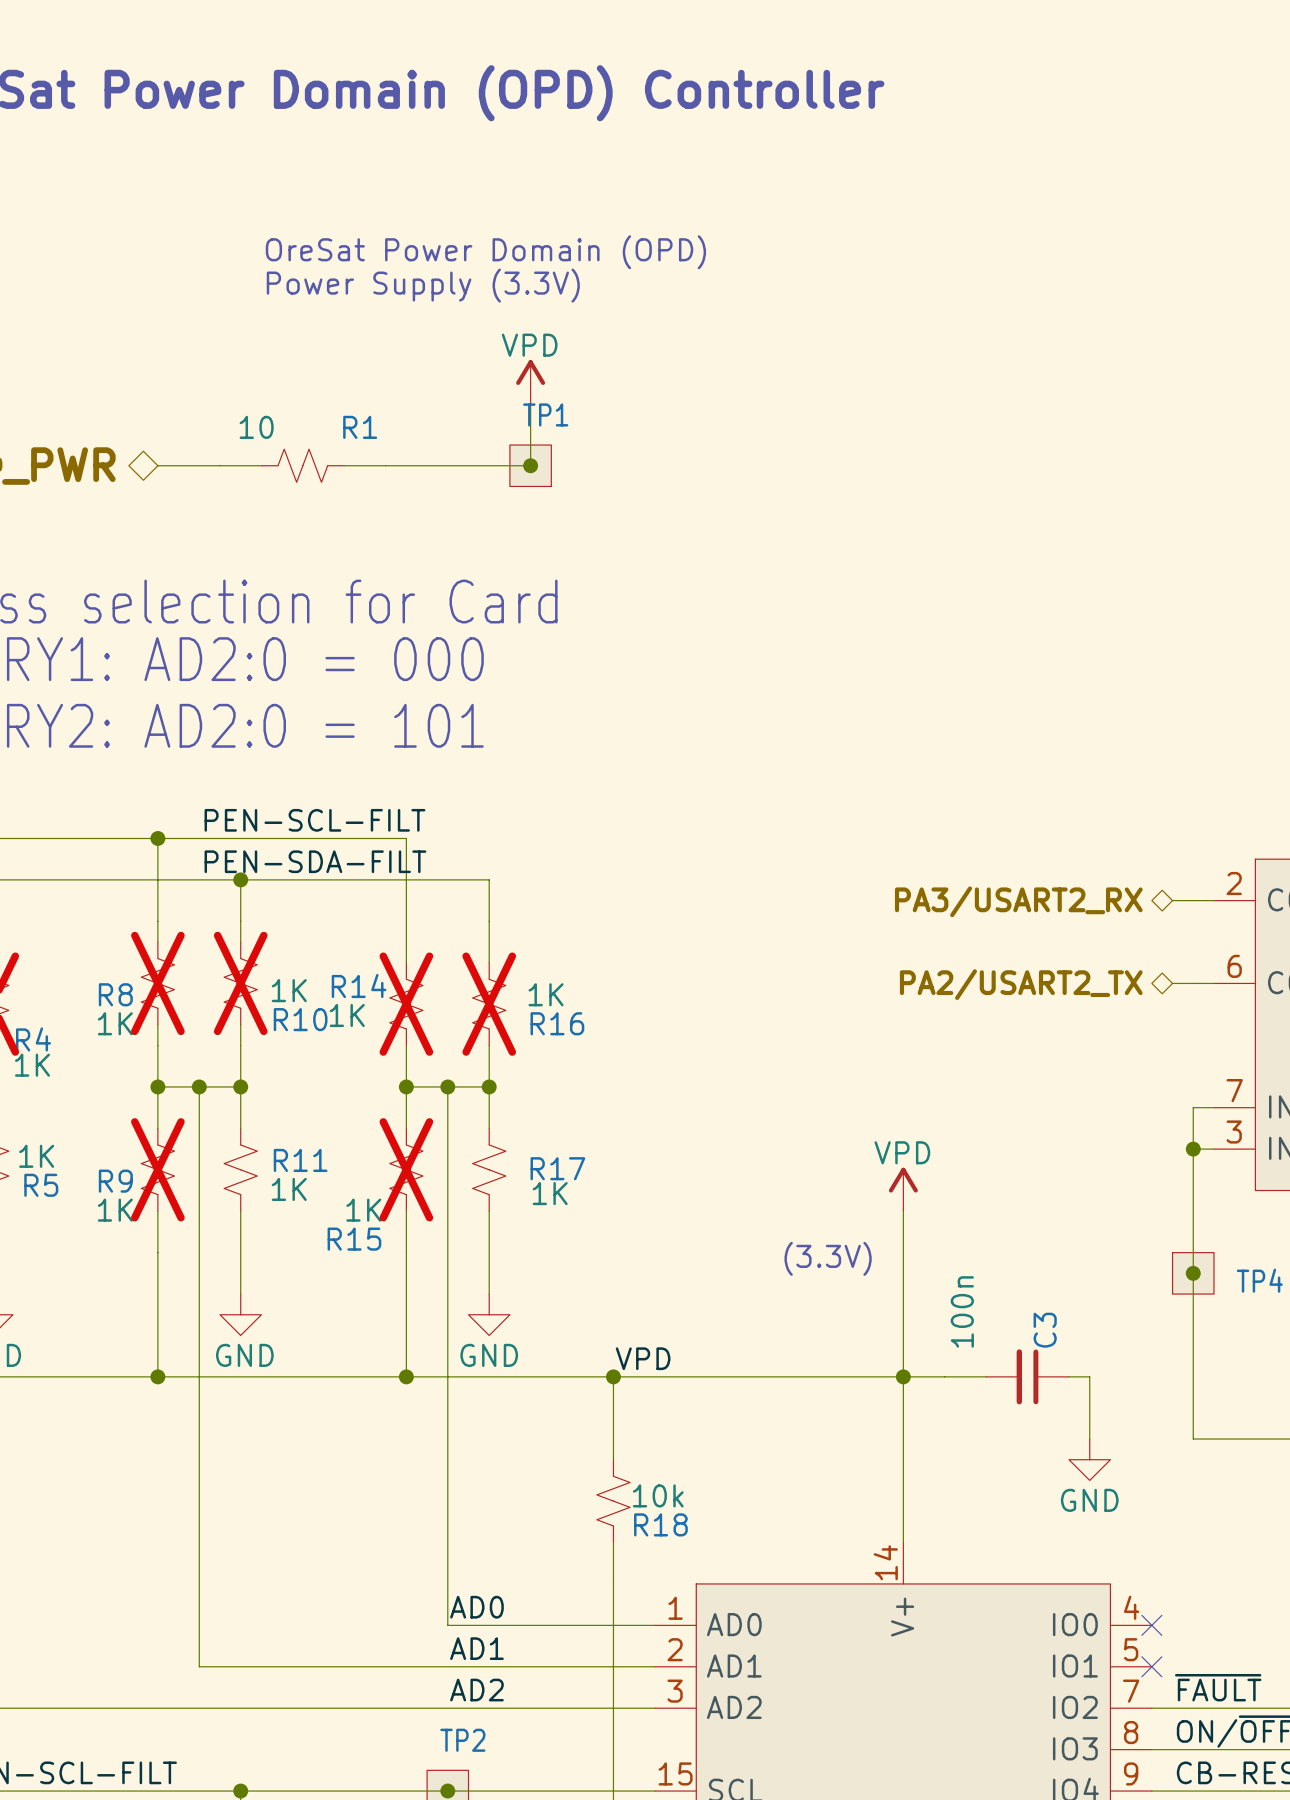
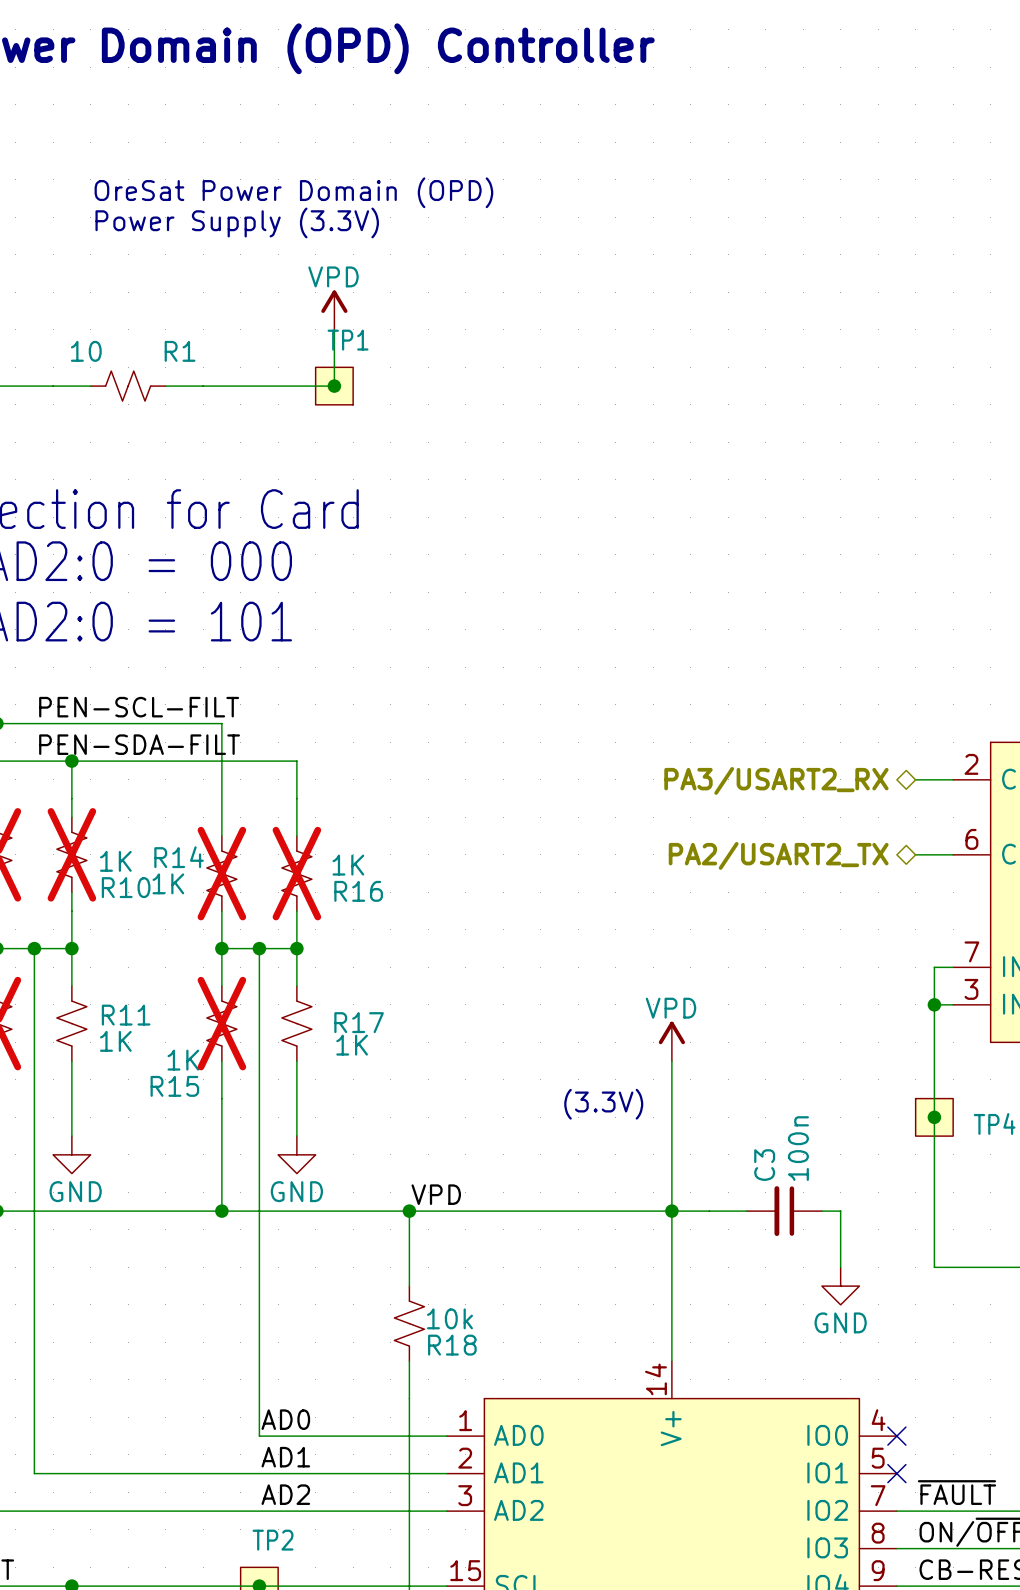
C3 value position: 100n (962, 1311) -> 100n (798, 1148)
C3 name position: C3 (1045, 1330) -> C3 (764, 1165)

